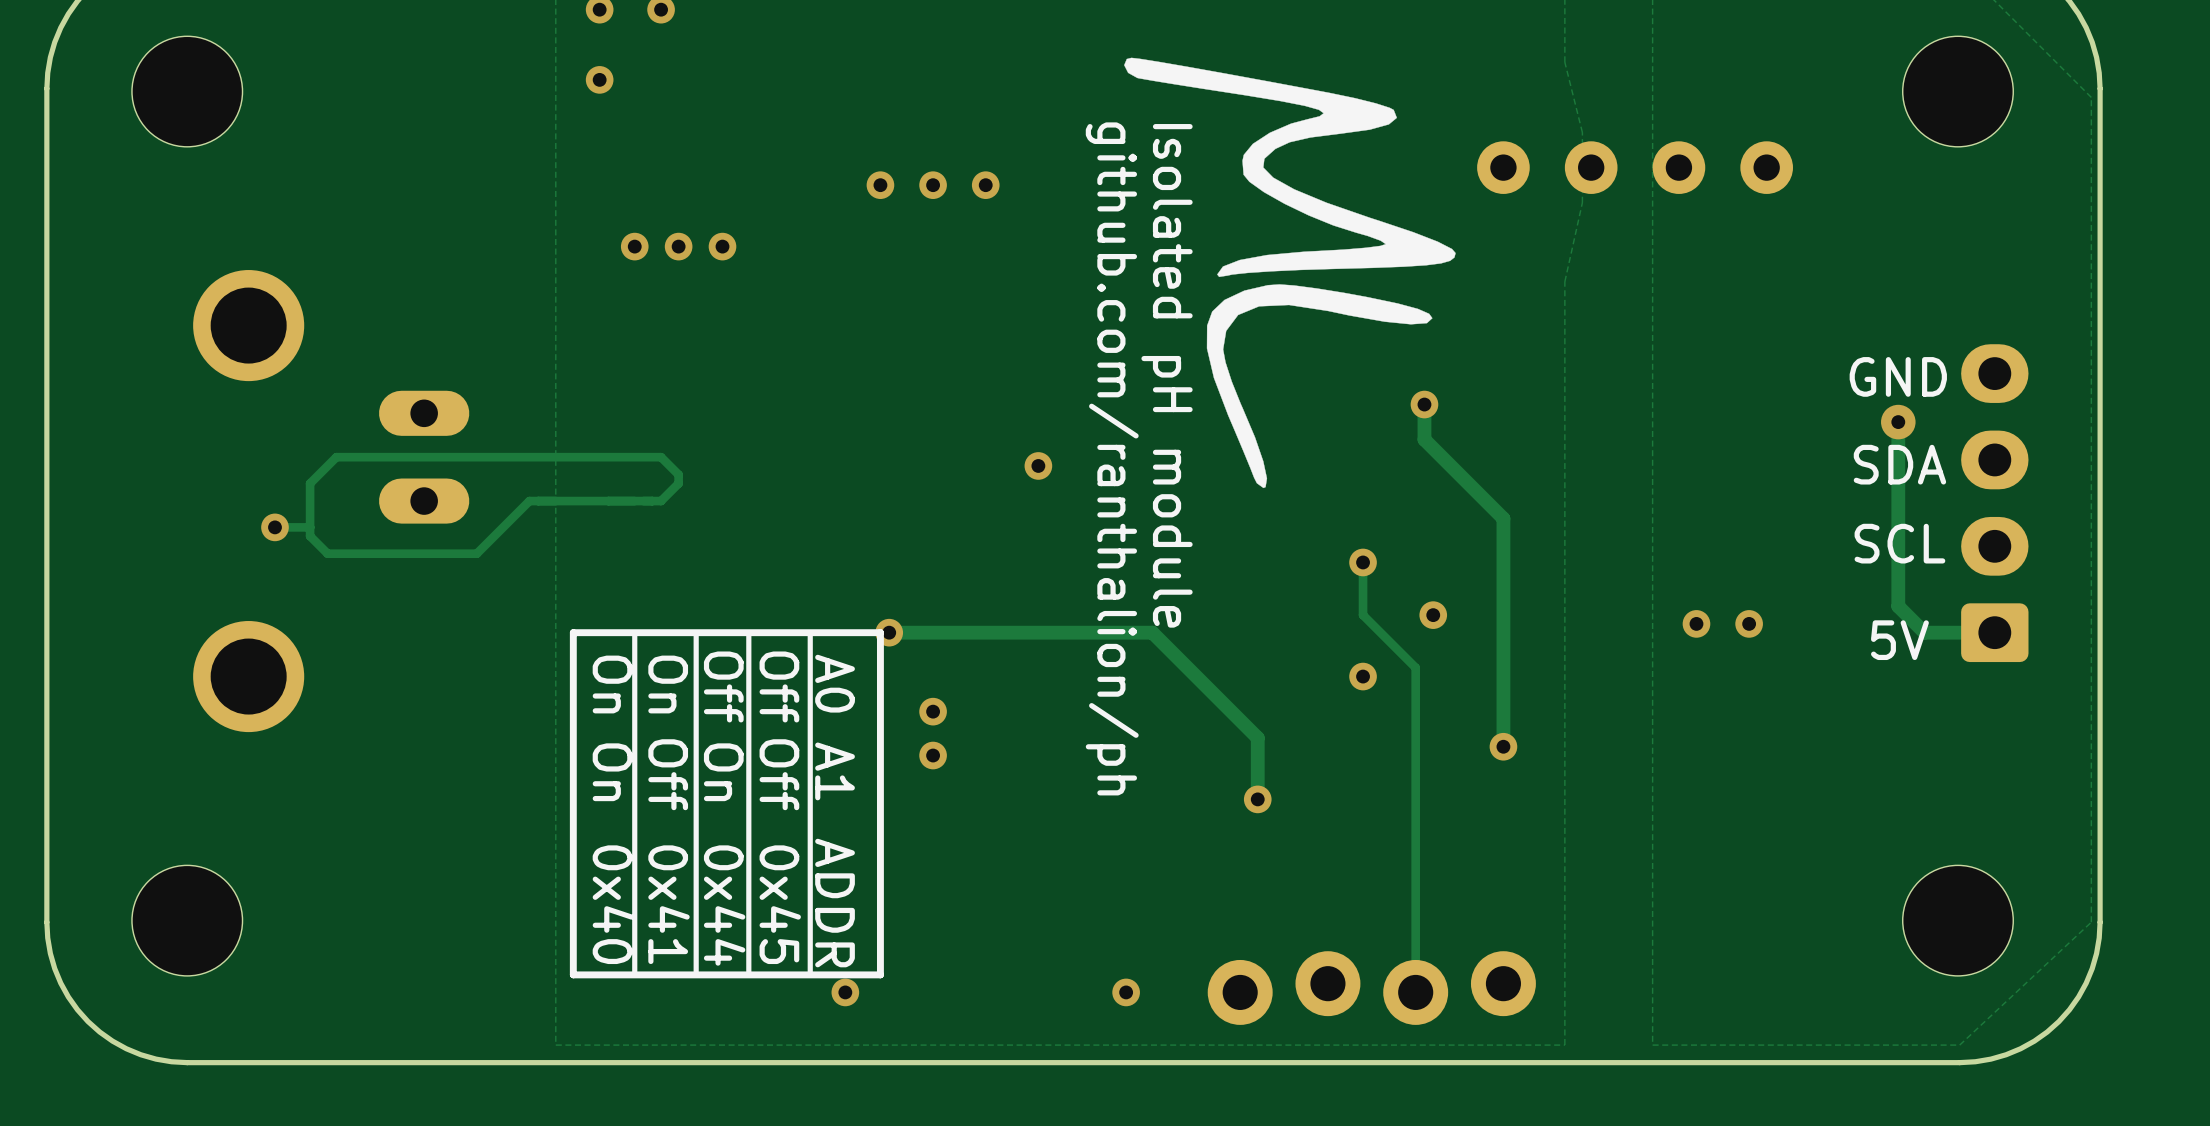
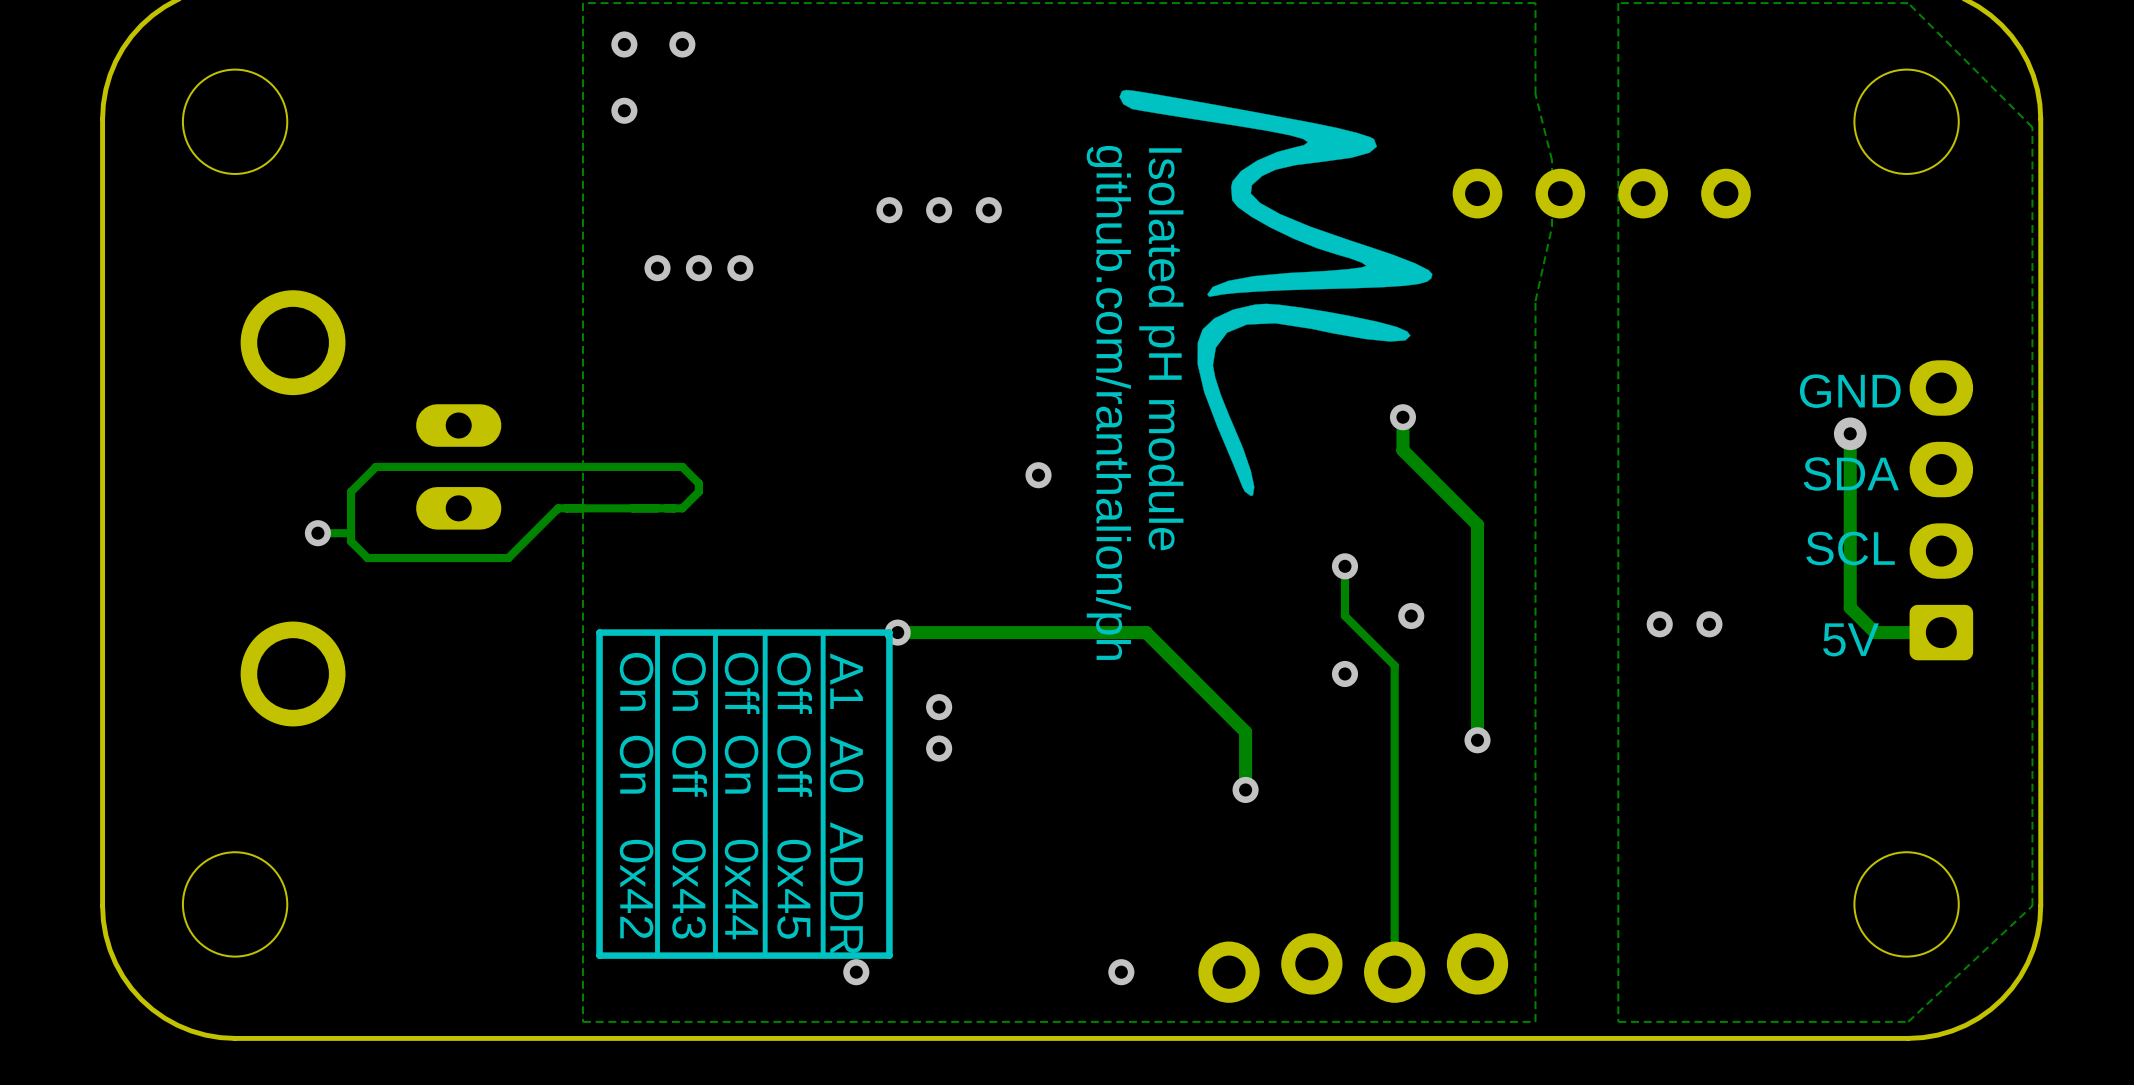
text: A0 (835, 683) -> A1 (846, 681)
text: A1 (835, 771) -> A0 (846, 764)
text: 0x40 (613, 904) -> 0x42 (636, 889)
text: 0x41 (668, 904) -> 0x43 (689, 889)

